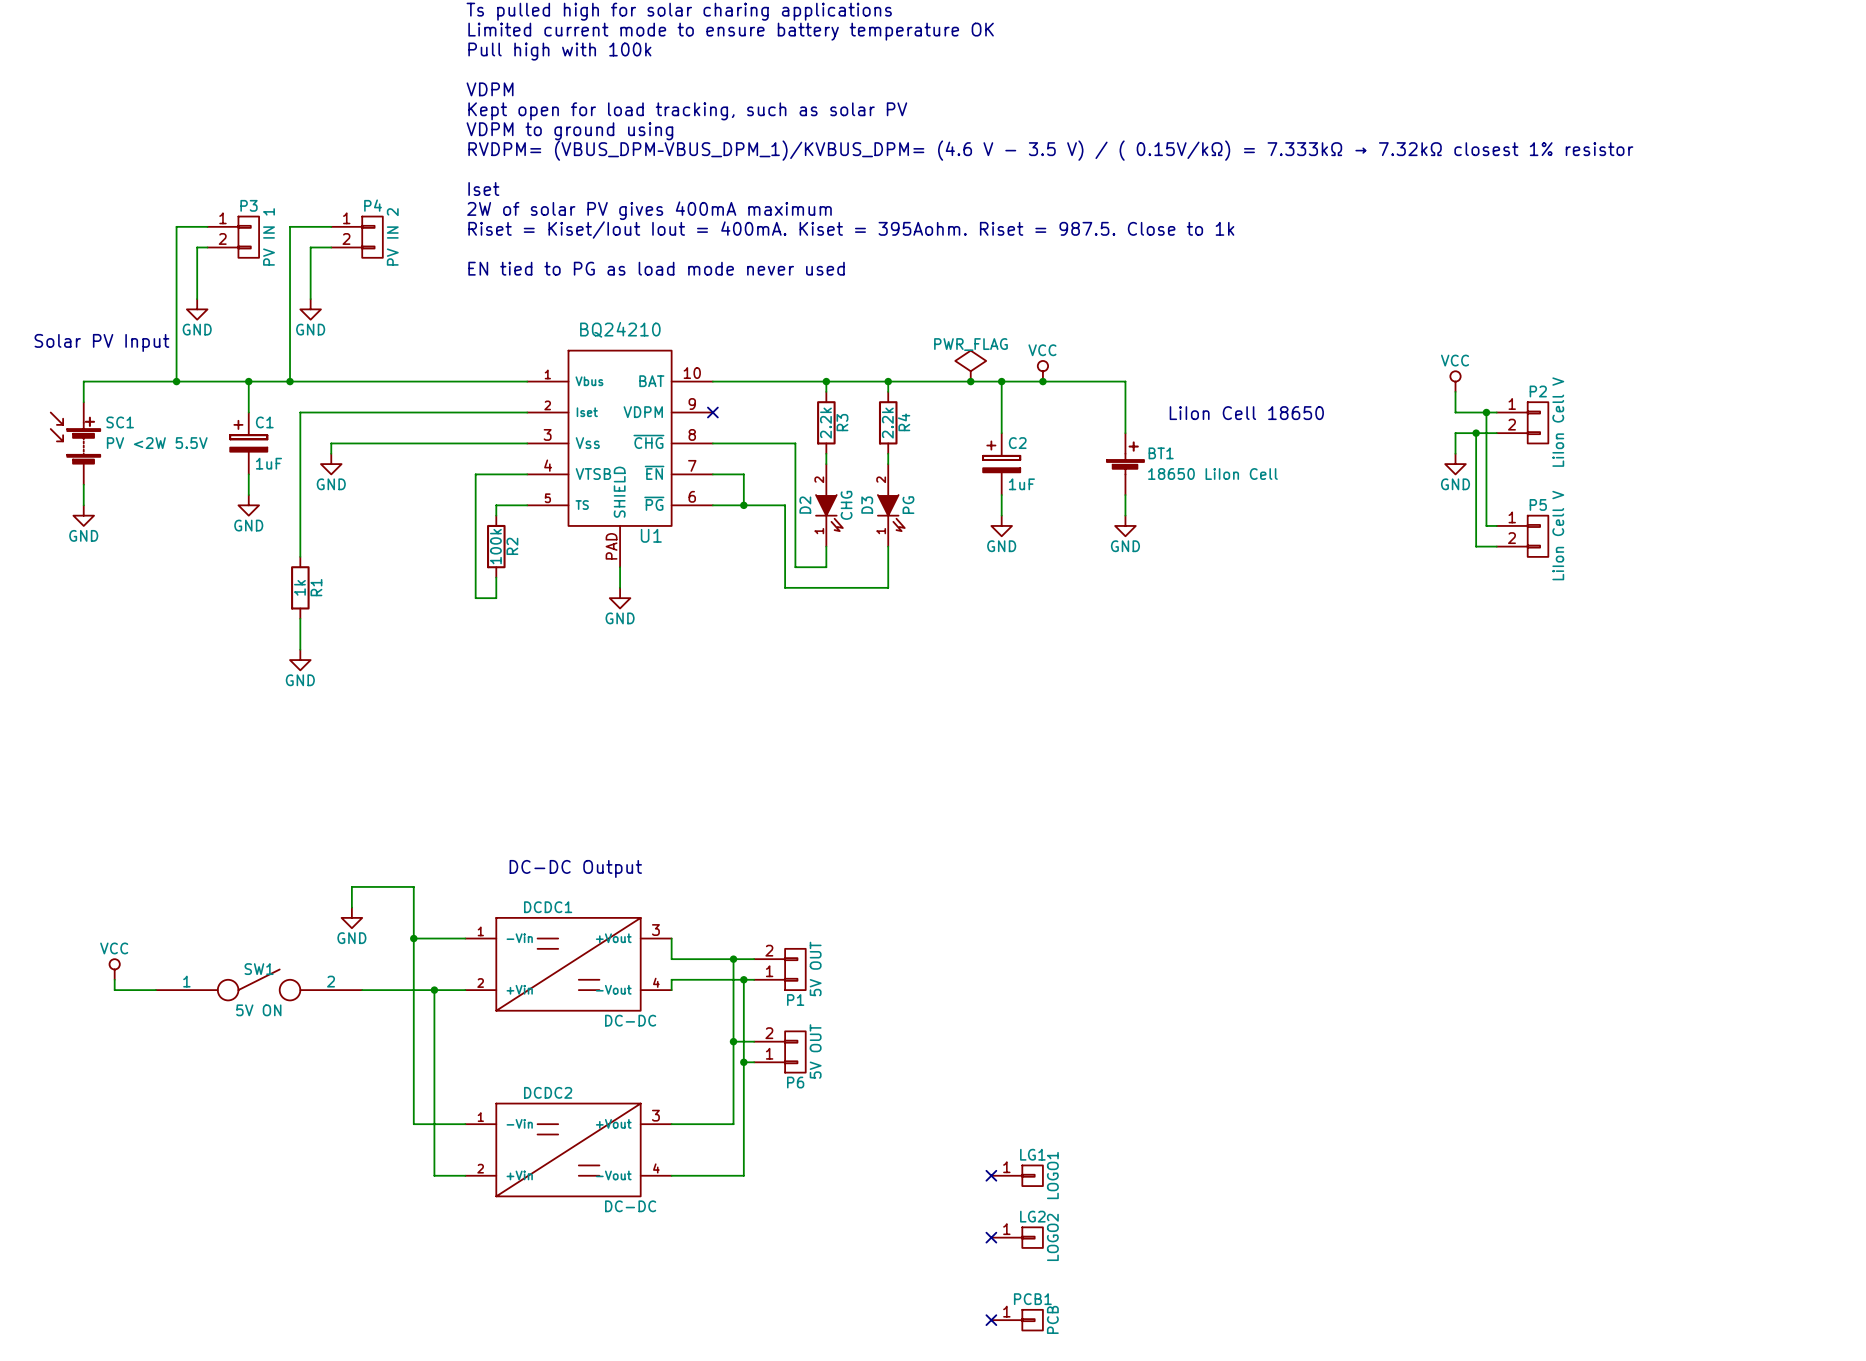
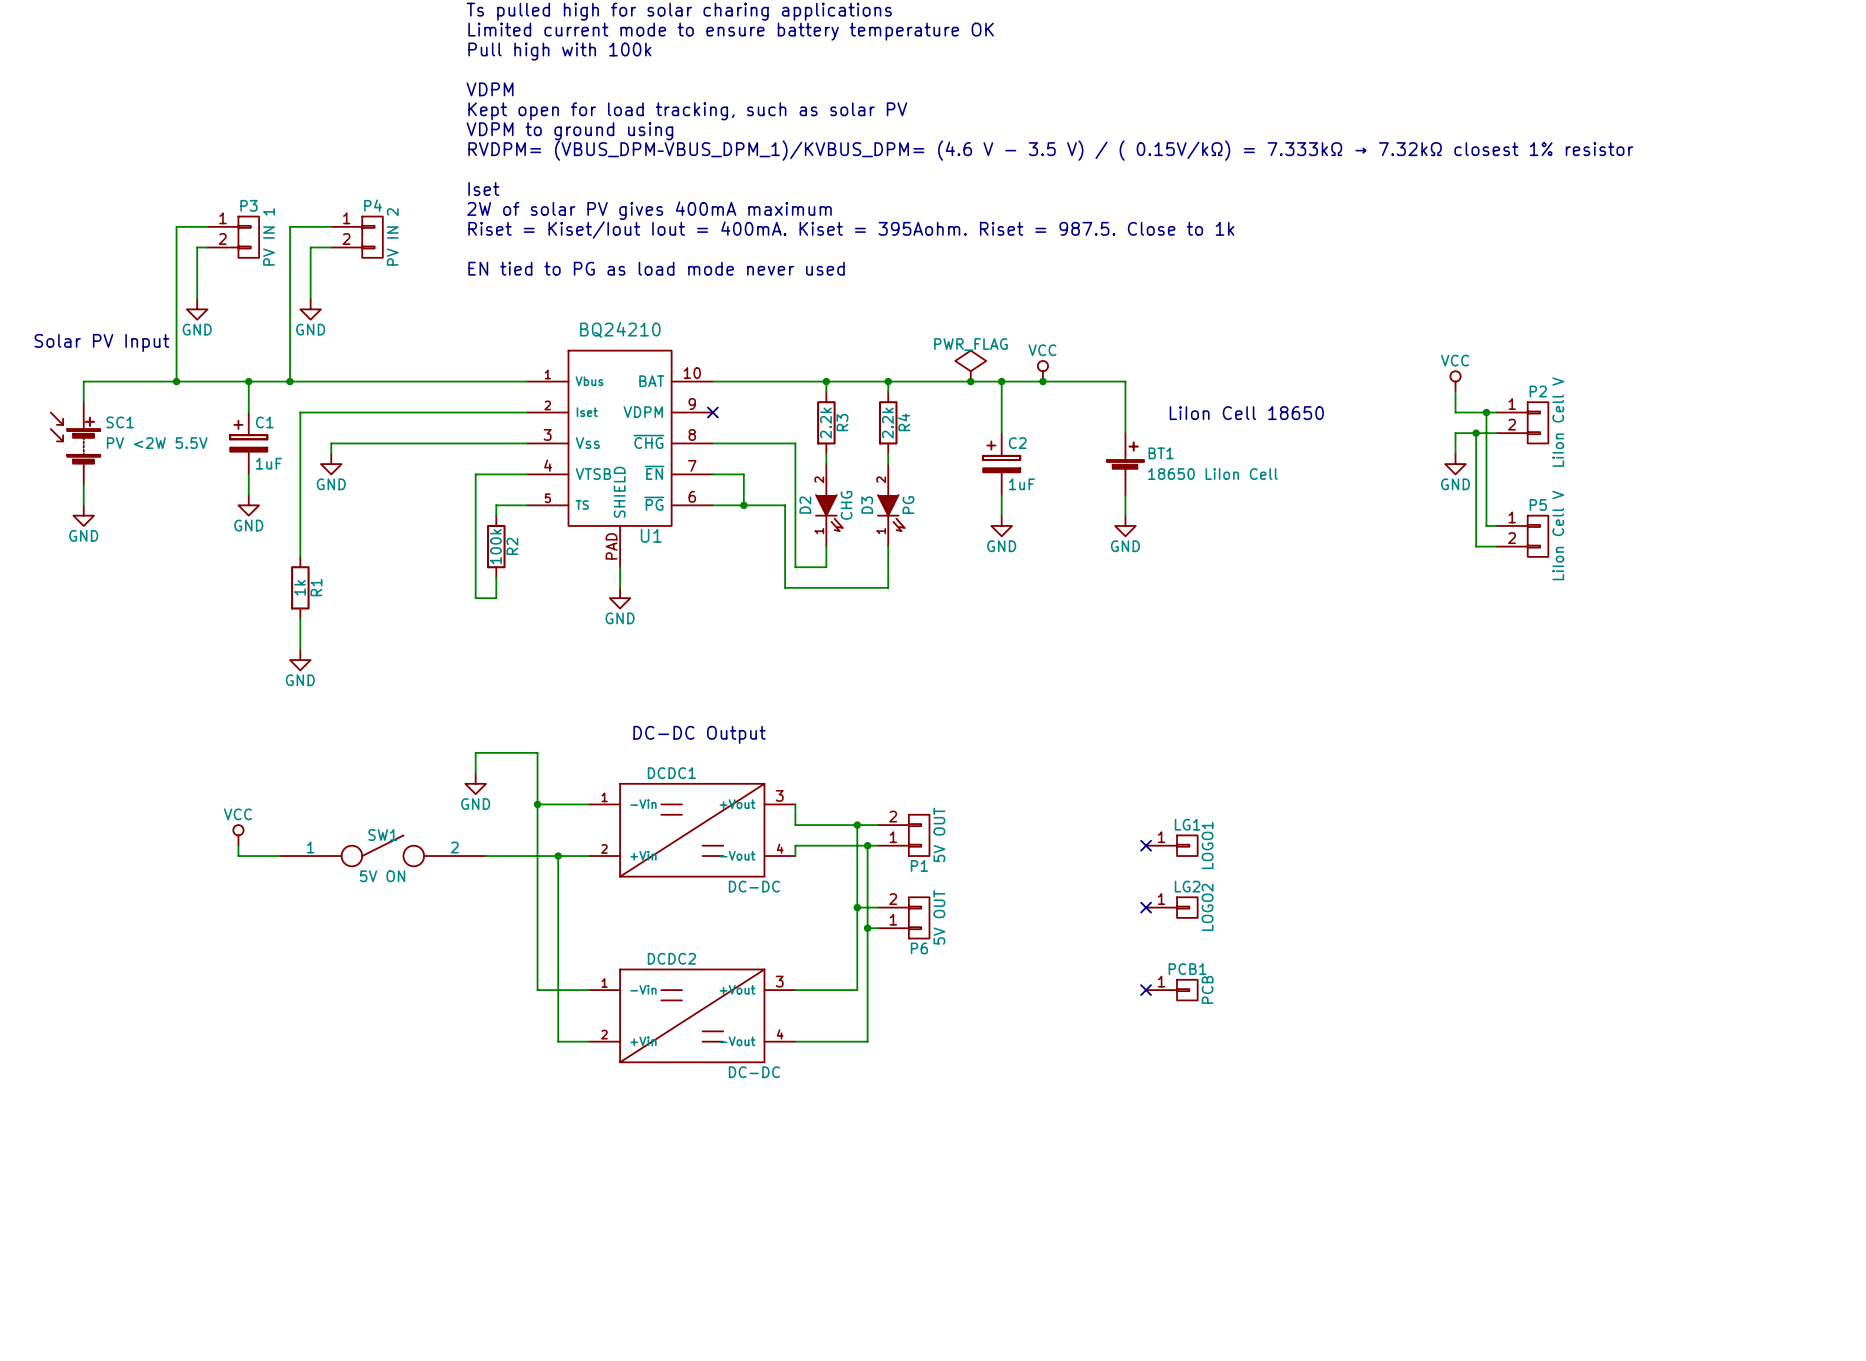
junction: none -> (537, 804)
junction: none -> (857, 825)
junction: none -> (867, 845)
no-connect mark: none -> (1146, 845)
junction: none -> (558, 856)
text position: DC-DC Output (575, 868) -> DC-DC Output (699, 734)
wire: (351, 907) (351, 886) (413, 886) (413, 1124) (465, 1124) -> (475, 773) (475, 752) (537, 752) (537, 990) (589, 990)
junction: none -> (857, 907)
no-connect mark: none -> (1146, 907)
power symbol position: GND (351, 917) -> GND (475, 783)
junction: none -> (867, 928)
wire: (413, 938) (465, 938) -> (537, 804) (589, 804)
junction: (413, 938) -> none
wire: (671, 938) (671, 959) (754, 959) -> (795, 804) (795, 825) (877, 825)
wire: (733, 959) (733, 1124) (671, 1124) -> (857, 825) (857, 990) (795, 990)
junction: (733, 959) -> none
DCDC1 position: (568, 964) -> (692, 830)
power symbol position: VCC (114, 969) -> VCC (238, 835)
P1 position: (779, 969) -> (903, 835)
wire: (114, 979) (114, 990) (155, 990) -> (238, 845) (238, 856) (279, 856)
wire: (743, 979) (743, 1175) (671, 1175) -> (867, 845) (867, 1041) (795, 1041)
junction: (743, 979) -> none
wire: (754, 979) (671, 979) (671, 990) -> (877, 845) (795, 845) (795, 856)
SW1 position: (259, 984) -> (382, 850)
wire: (362, 990) (465, 990) -> (485, 856) (589, 856)
wire: (434, 990) (434, 1175) (465, 1175) -> (558, 856) (558, 1041) (589, 1041)
junction: (434, 990) -> none
no-connect mark: none -> (1146, 990)
wire: (733, 1041) (754, 1041) -> (857, 907) (877, 907)
junction: (733, 1041) -> none
P6 position: (779, 1051) -> (903, 917)
junction: (743, 1062) -> none
DCDC2 position: (568, 1149) -> (692, 1015)
no-connect mark: (991, 1175) -> none
LG1 position: (1017, 1175) -> (1171, 845)
no-connect mark: (991, 1237) -> none
LG2 position: (1017, 1237) -> (1171, 907)
no-connect mark: (991, 1320) -> none
PCB1 position: (1017, 1320) -> (1171, 990)

